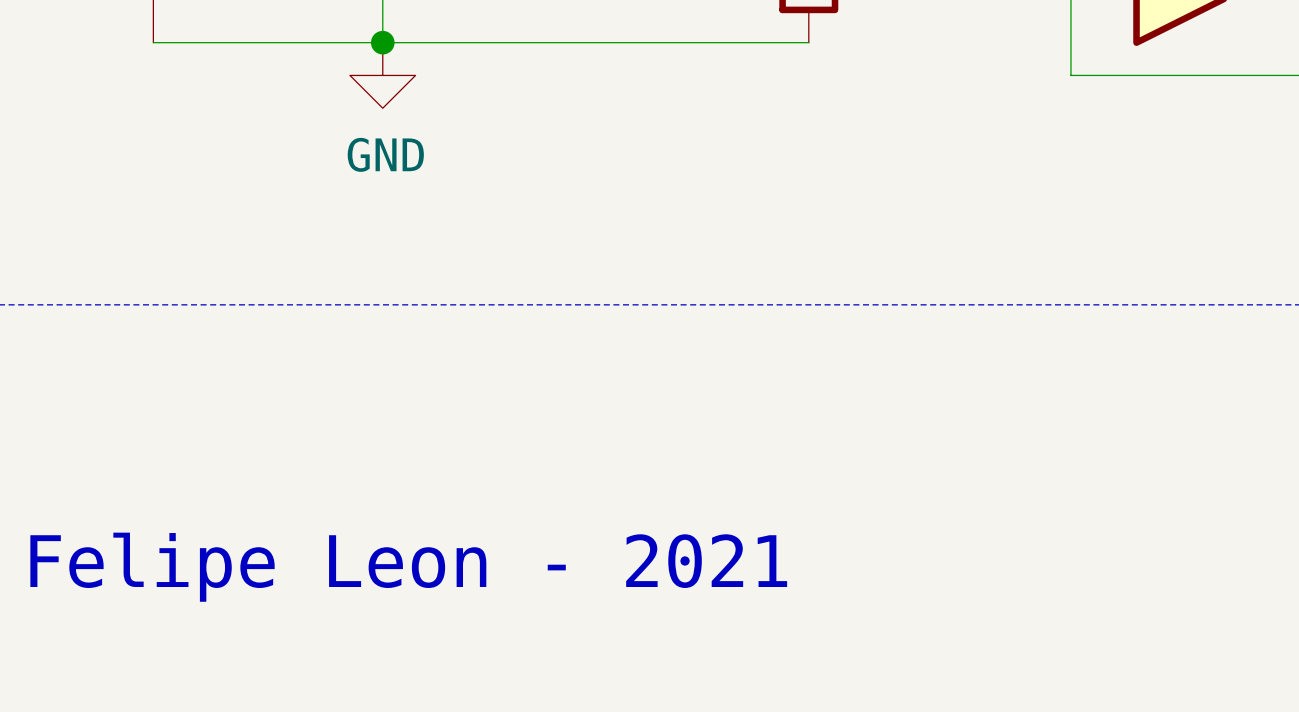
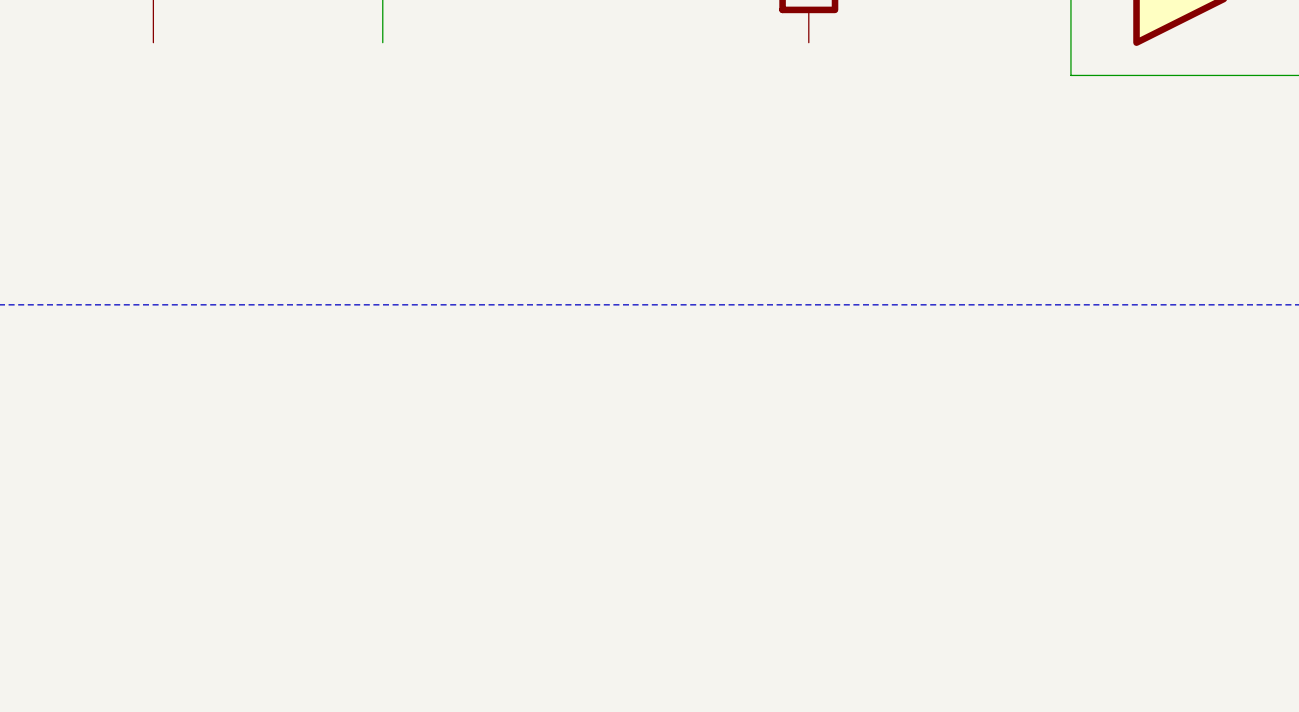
wire: (153, 42) (808, 42) -> none
junction: (382, 42) -> none
power symbol: GND (382, 75) -> none
text: Felipe Leon - 2021 (408, 567) -> none

